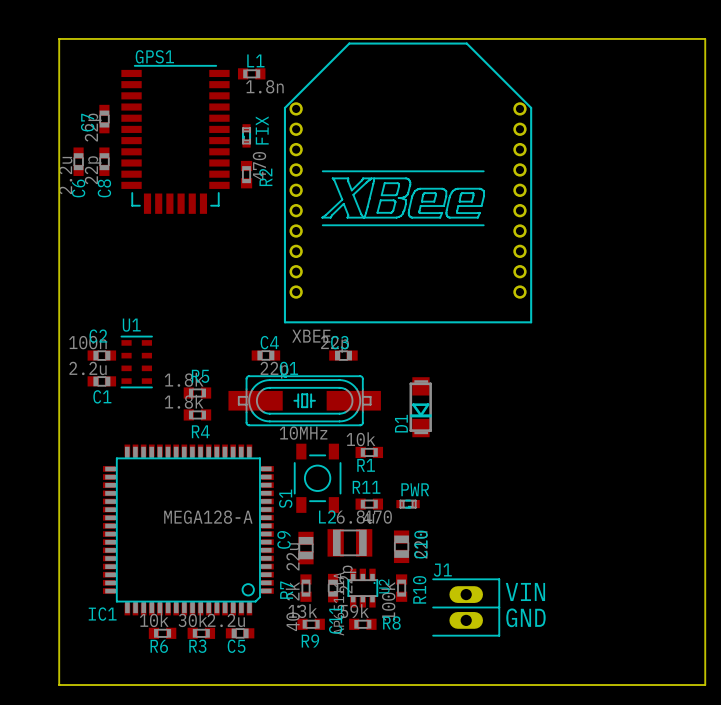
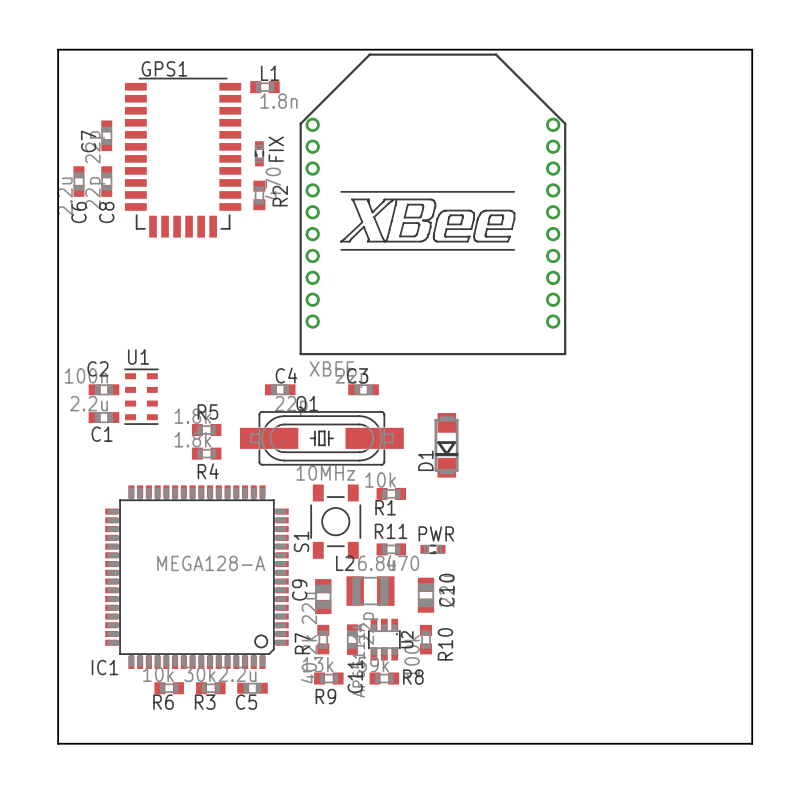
text: VIN (525, 591) -> none
J1: (466, 607) -> none
text: GND (525, 617) -> none

